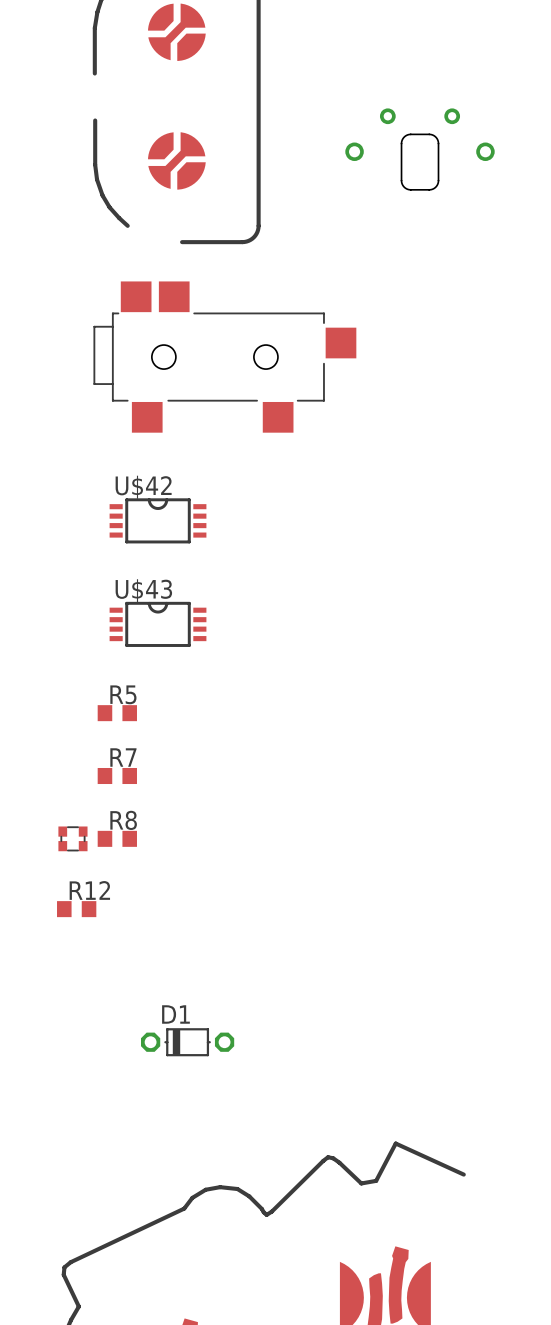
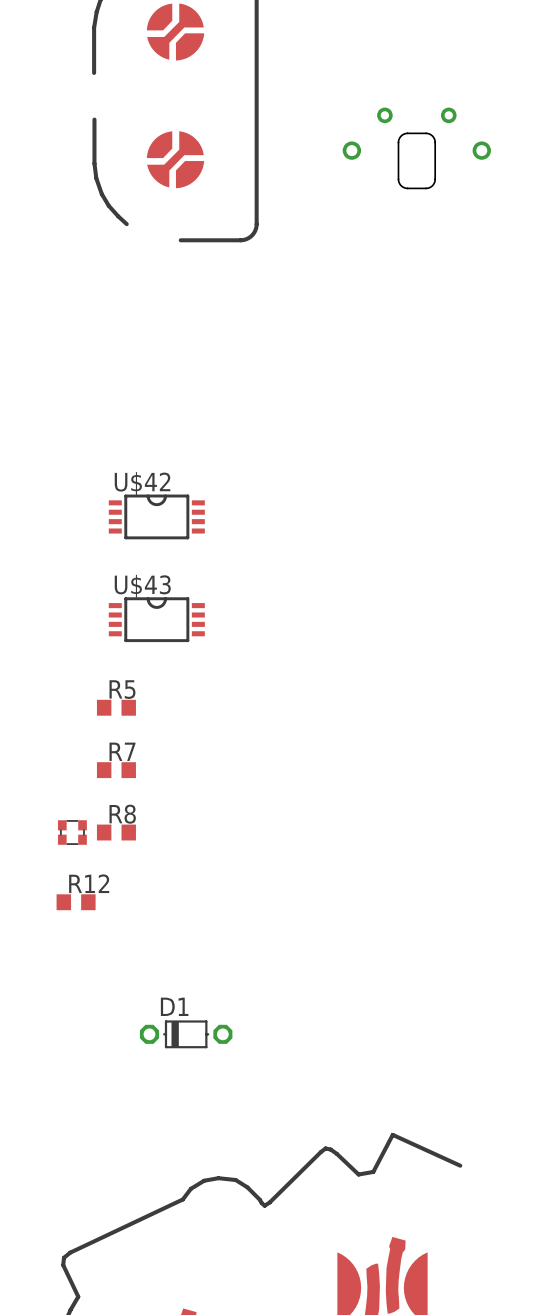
part: (224, 357) -> none

